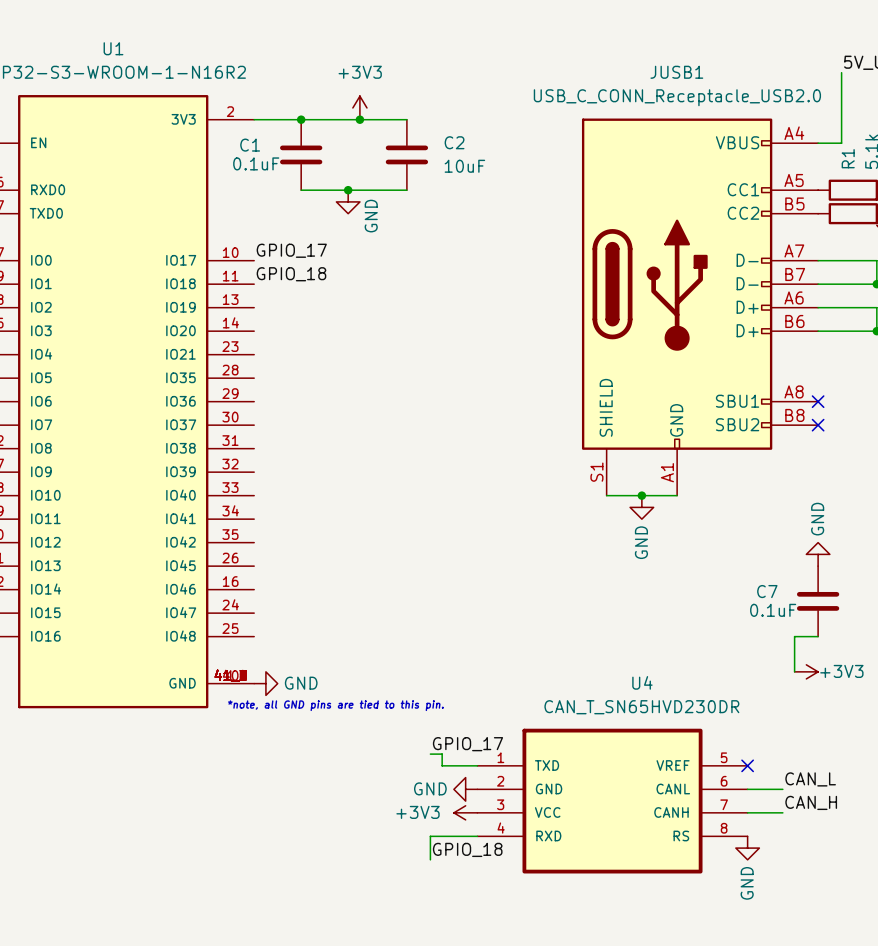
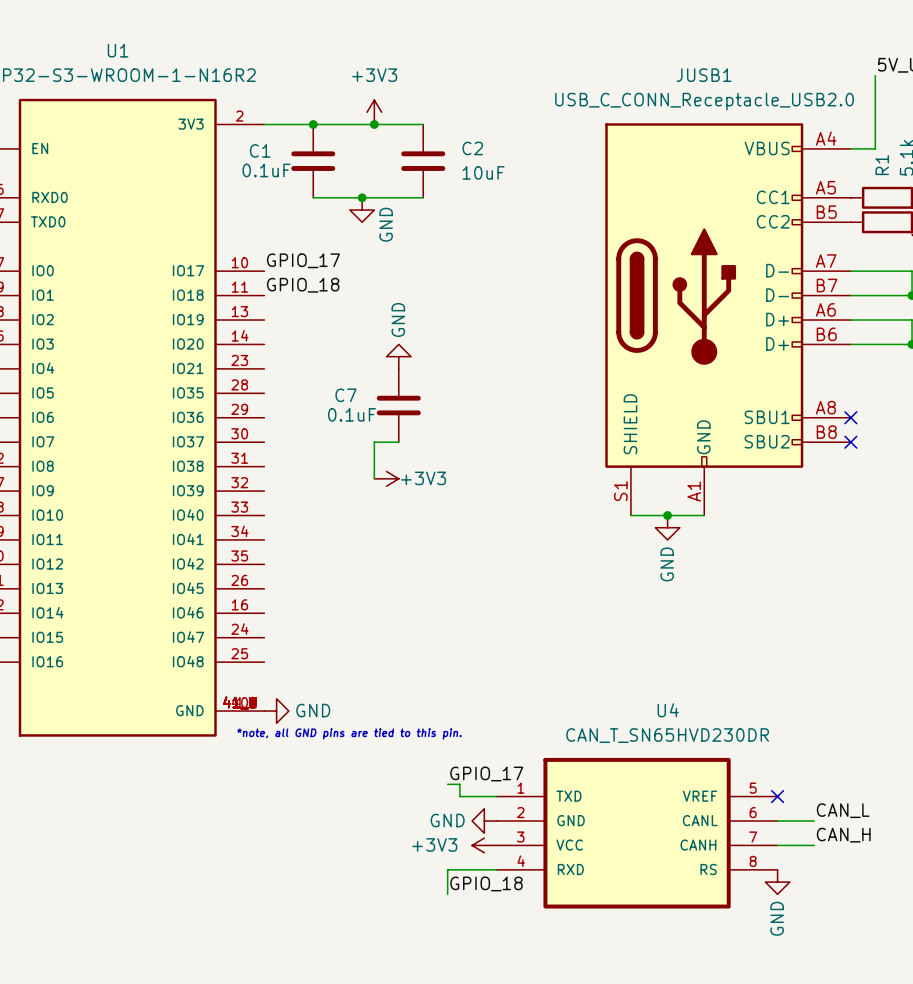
power symbol: none -> GND (398, 356)
wire: none -> (398, 442) (374, 442) (374, 478)
power symbol: none -> +3V3 (386, 478)
power symbol: GND (818, 554) -> none
C7 position: (818, 601) -> (398, 405)
wire: (818, 636) (794, 636) (794, 671) -> none
power symbol: +3V3 (806, 671) -> none

